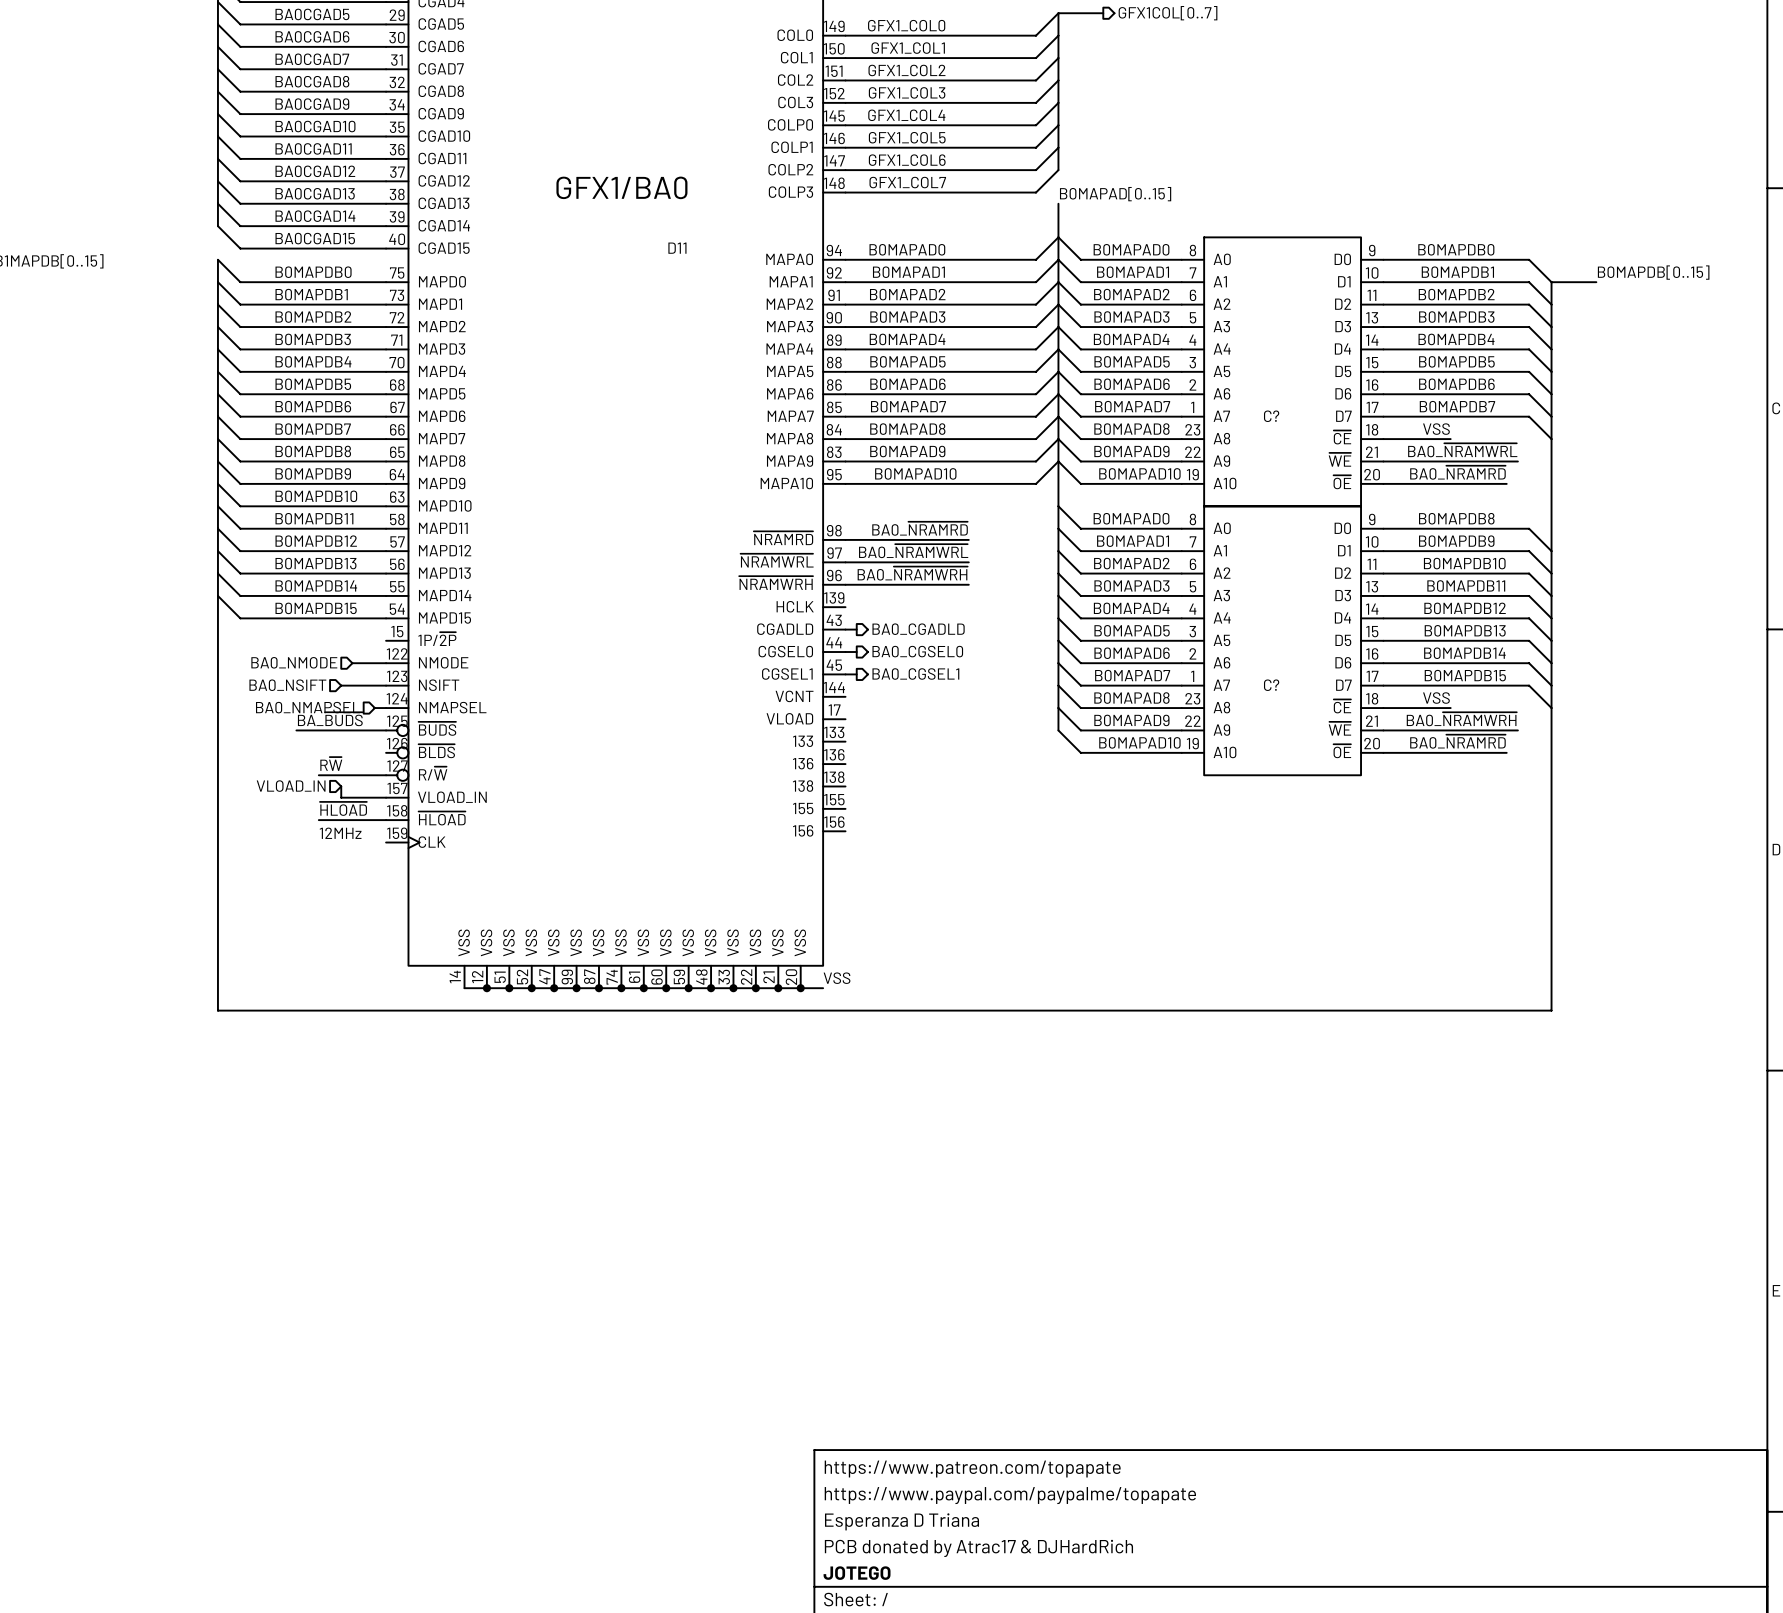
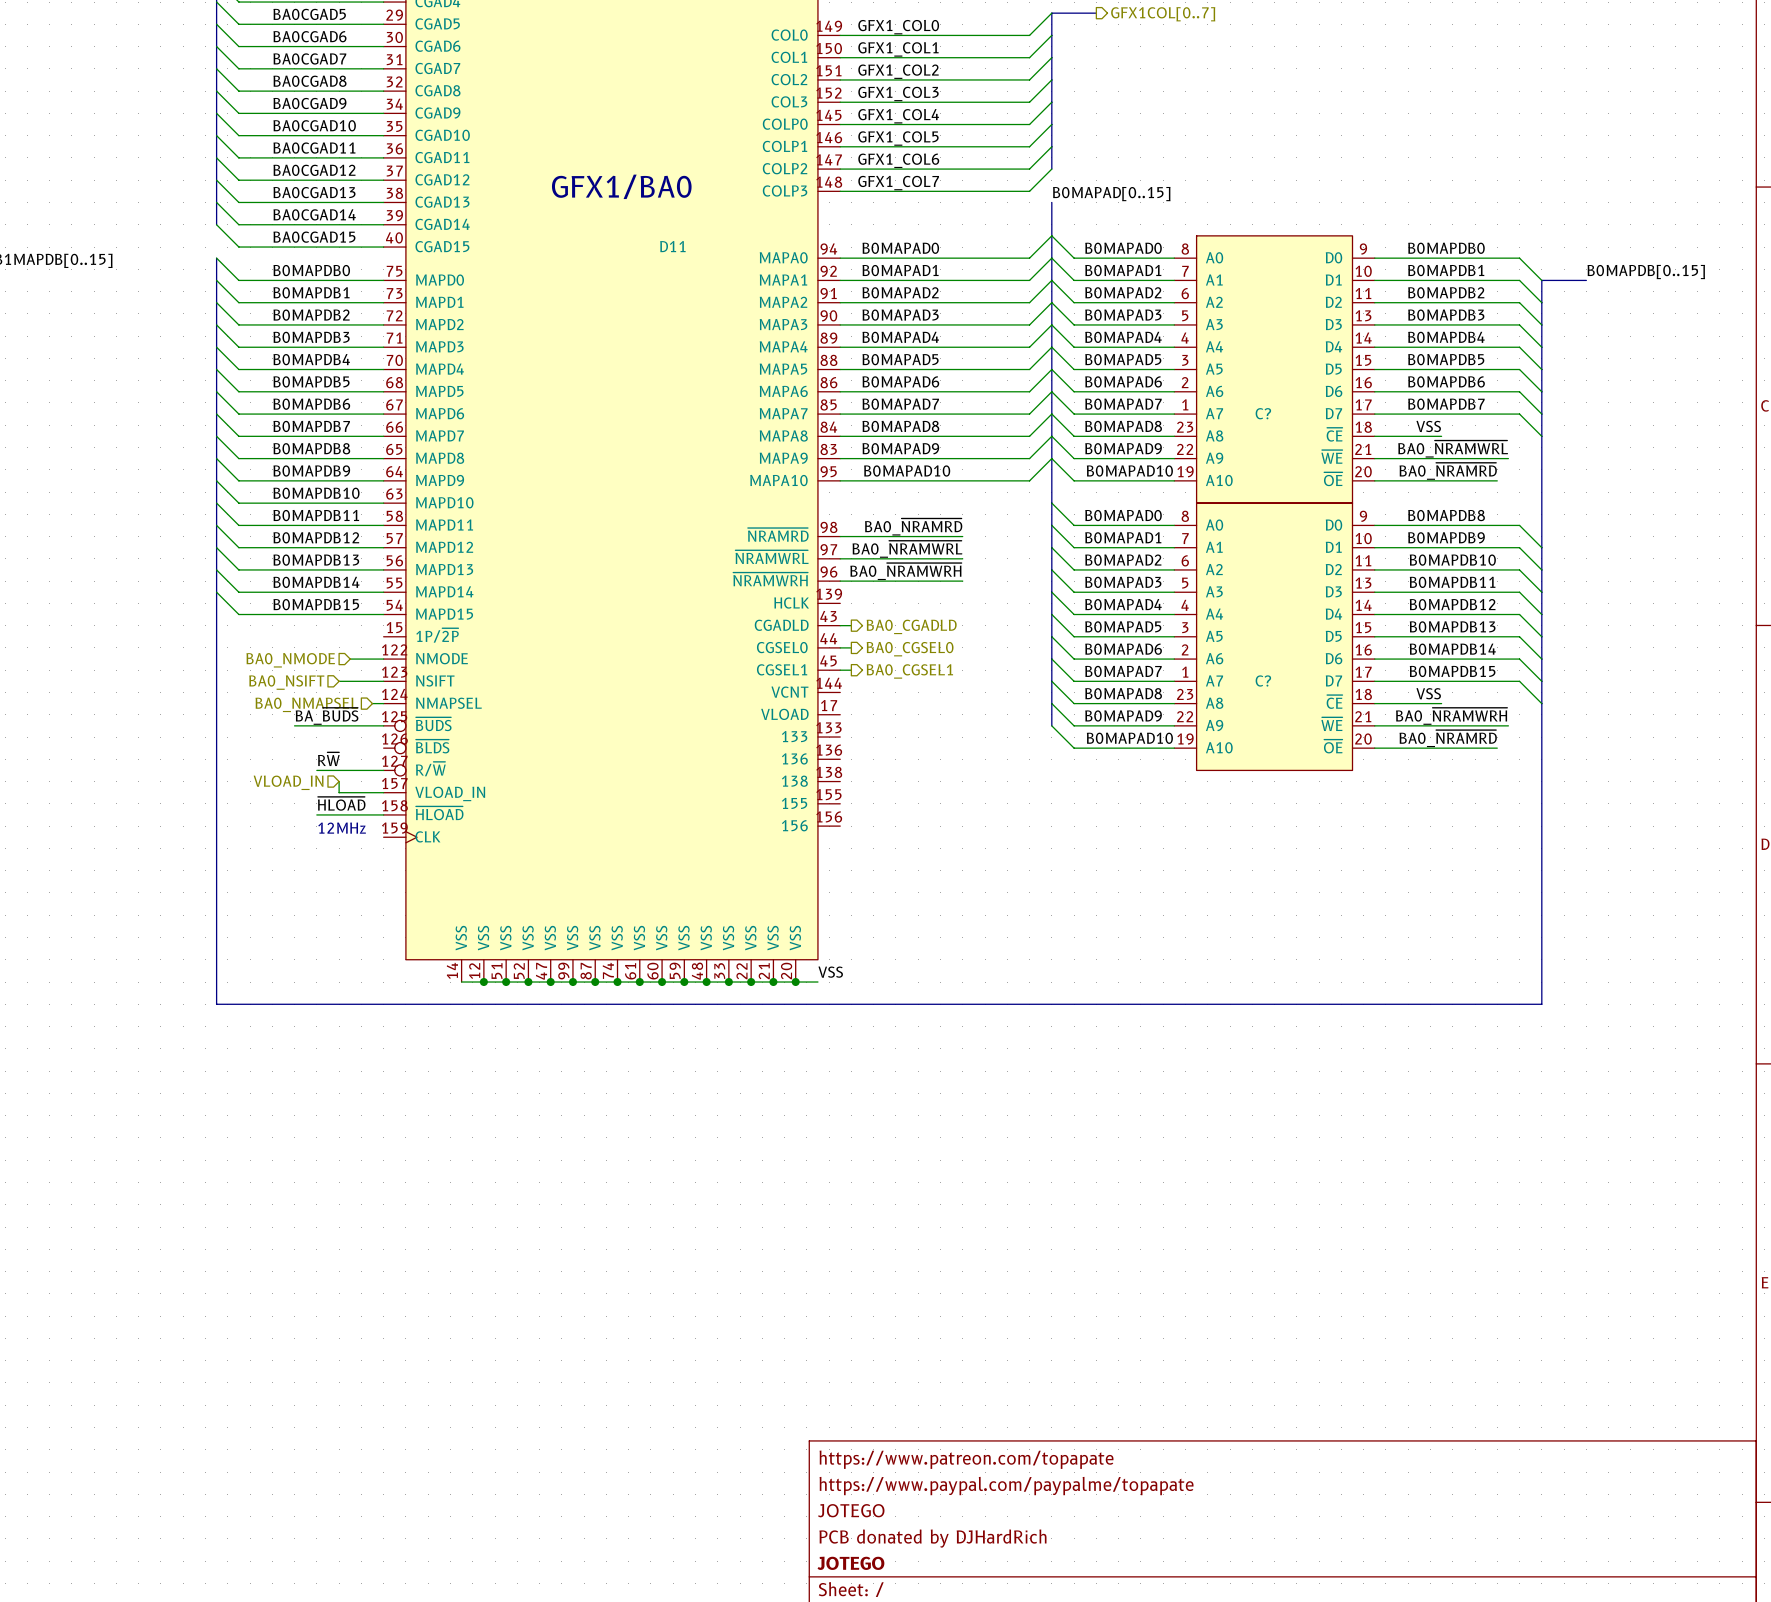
title block: Esperanza D Triana (902, 1521) -> JOTEGO (851, 1510)
title block: PCB donated by Atrac17 & DJHardRich (978, 1548) -> PCB donated by DJHardRich (932, 1538)

